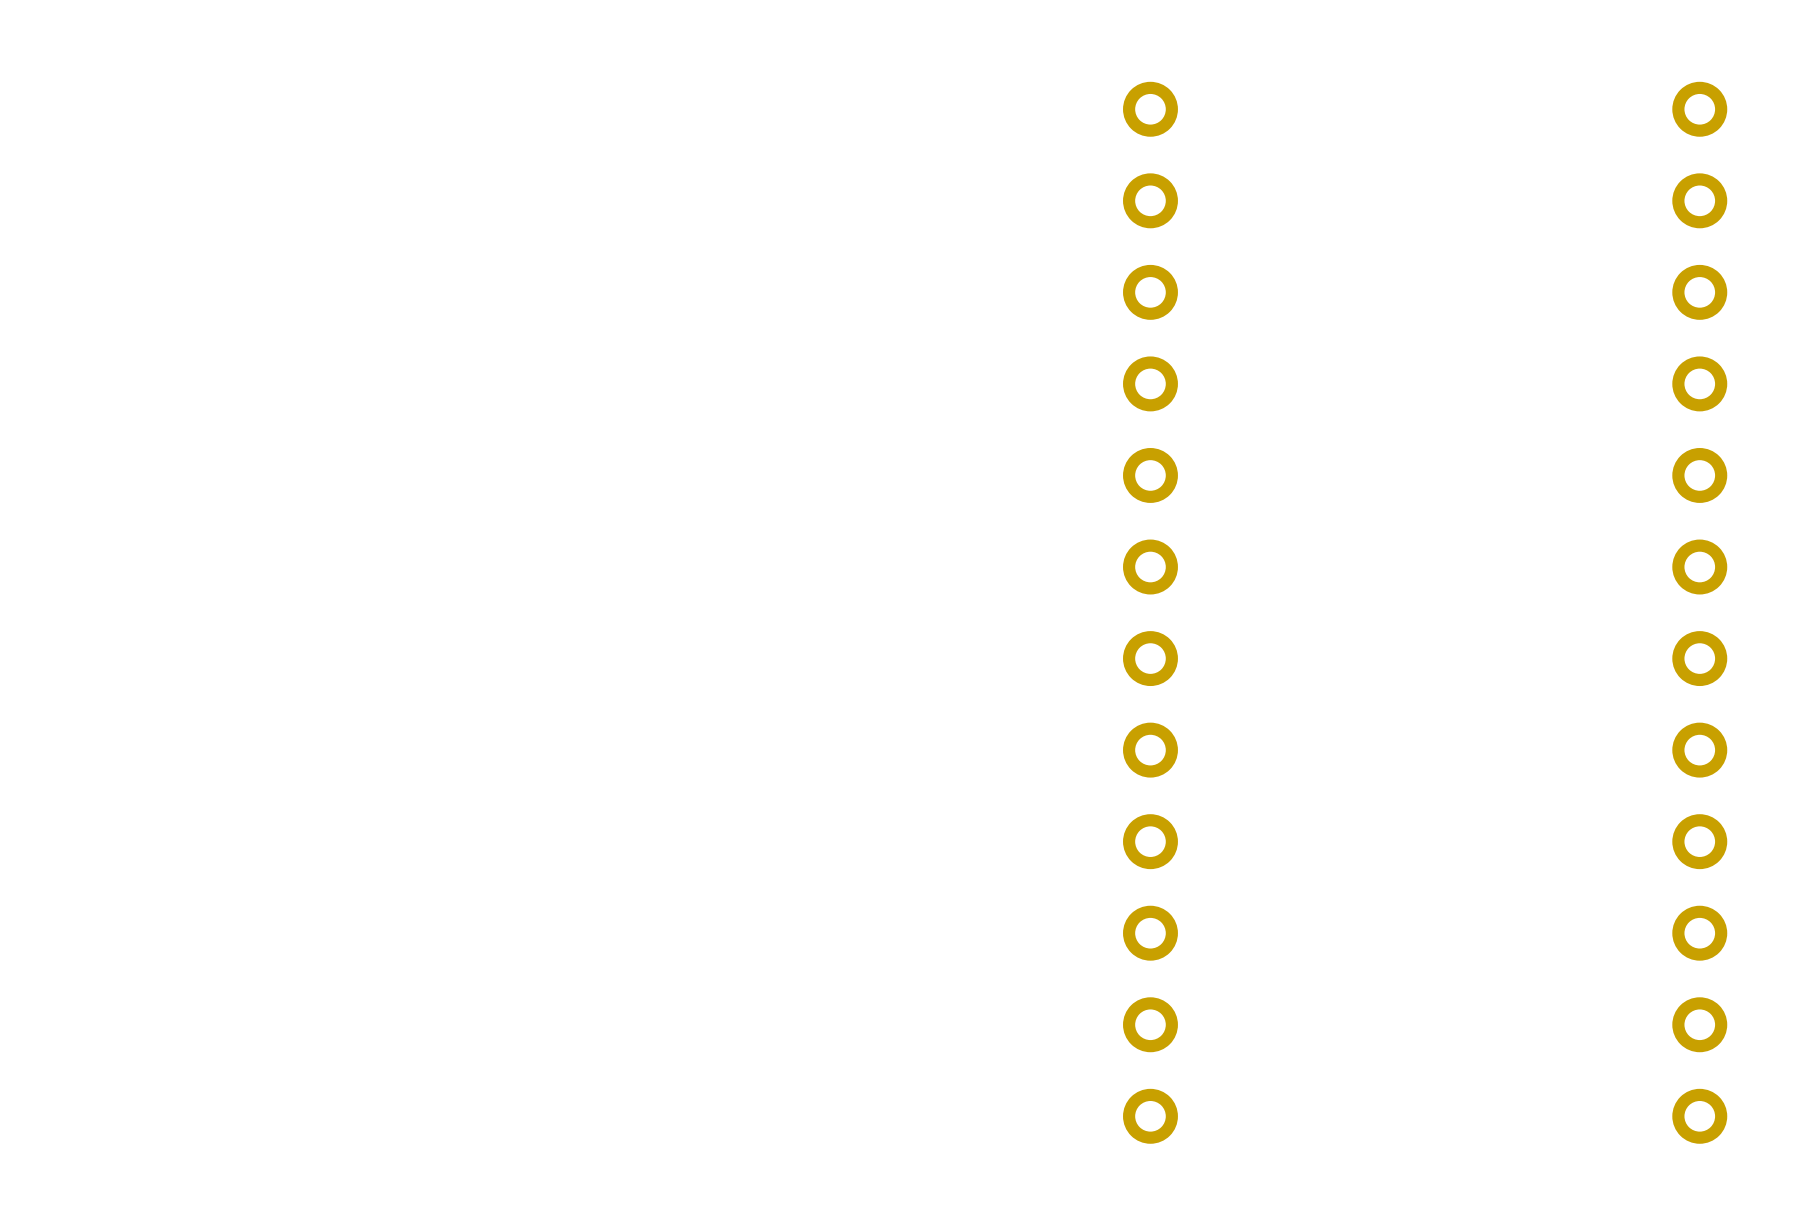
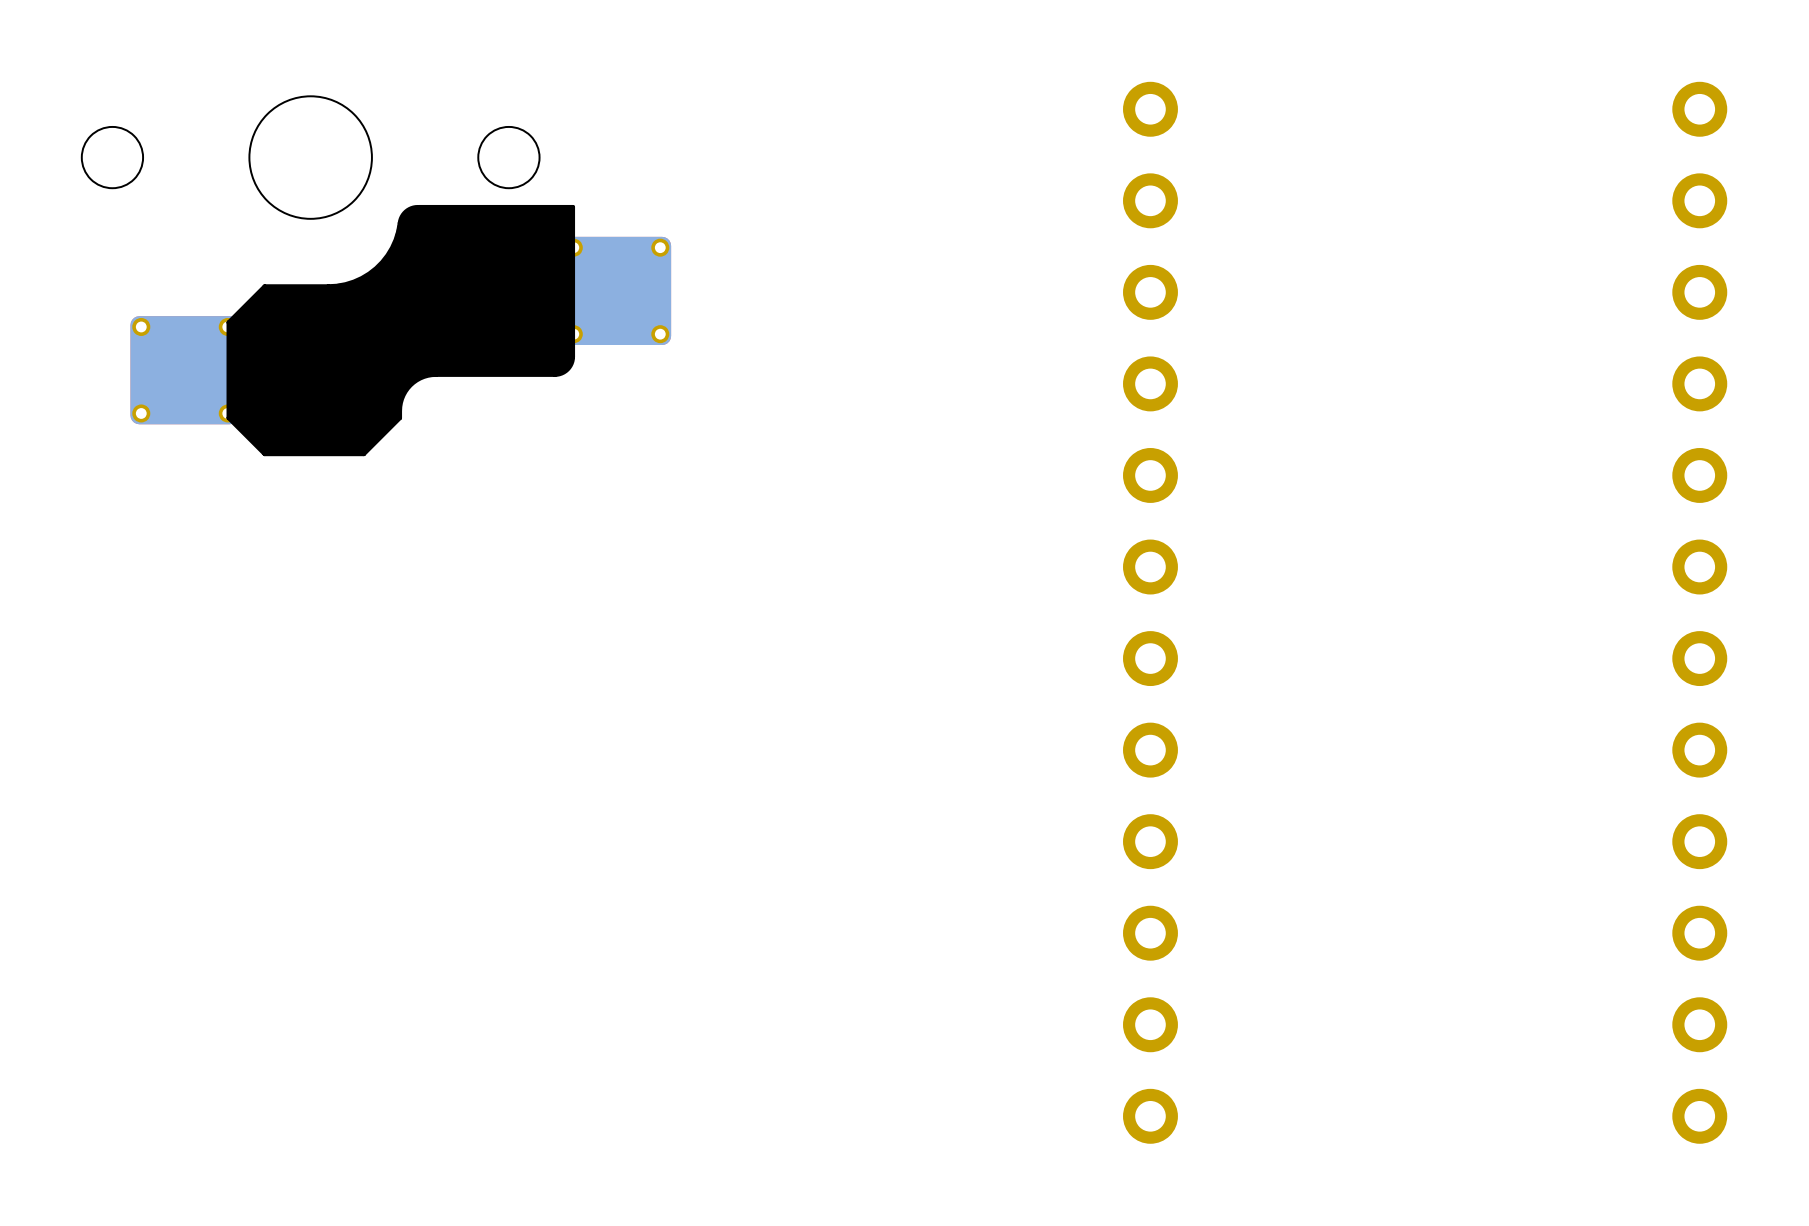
part: none -> (376, 276)

